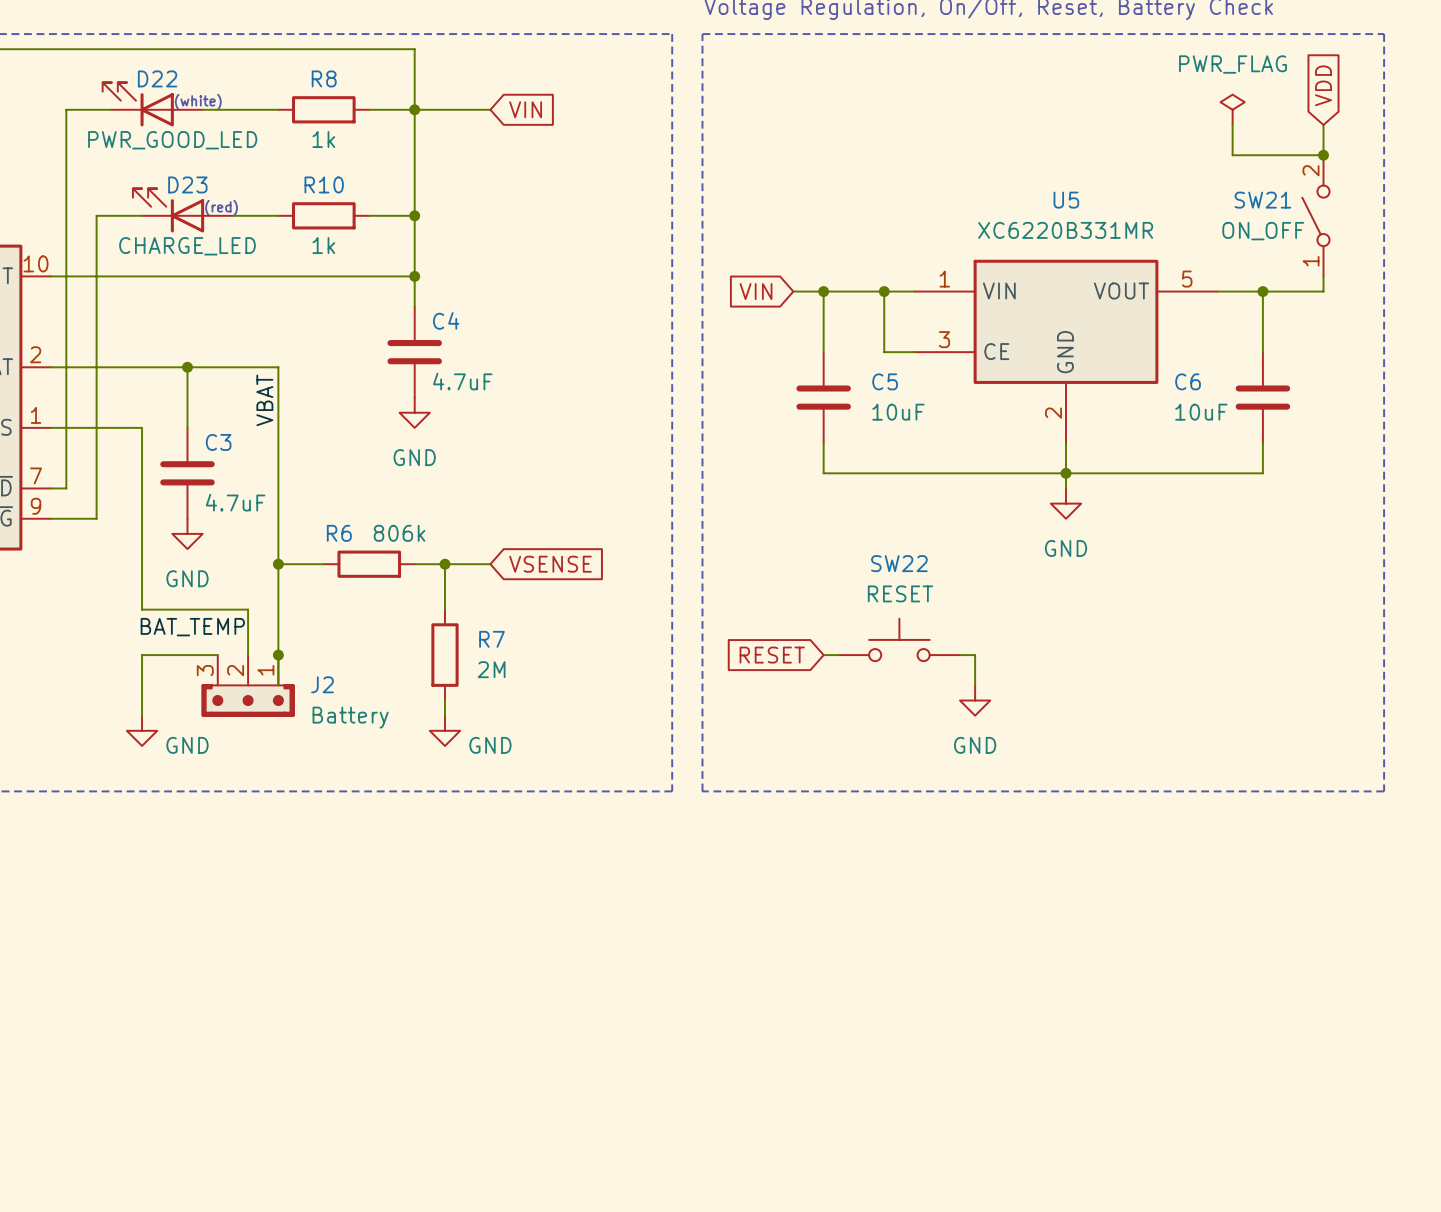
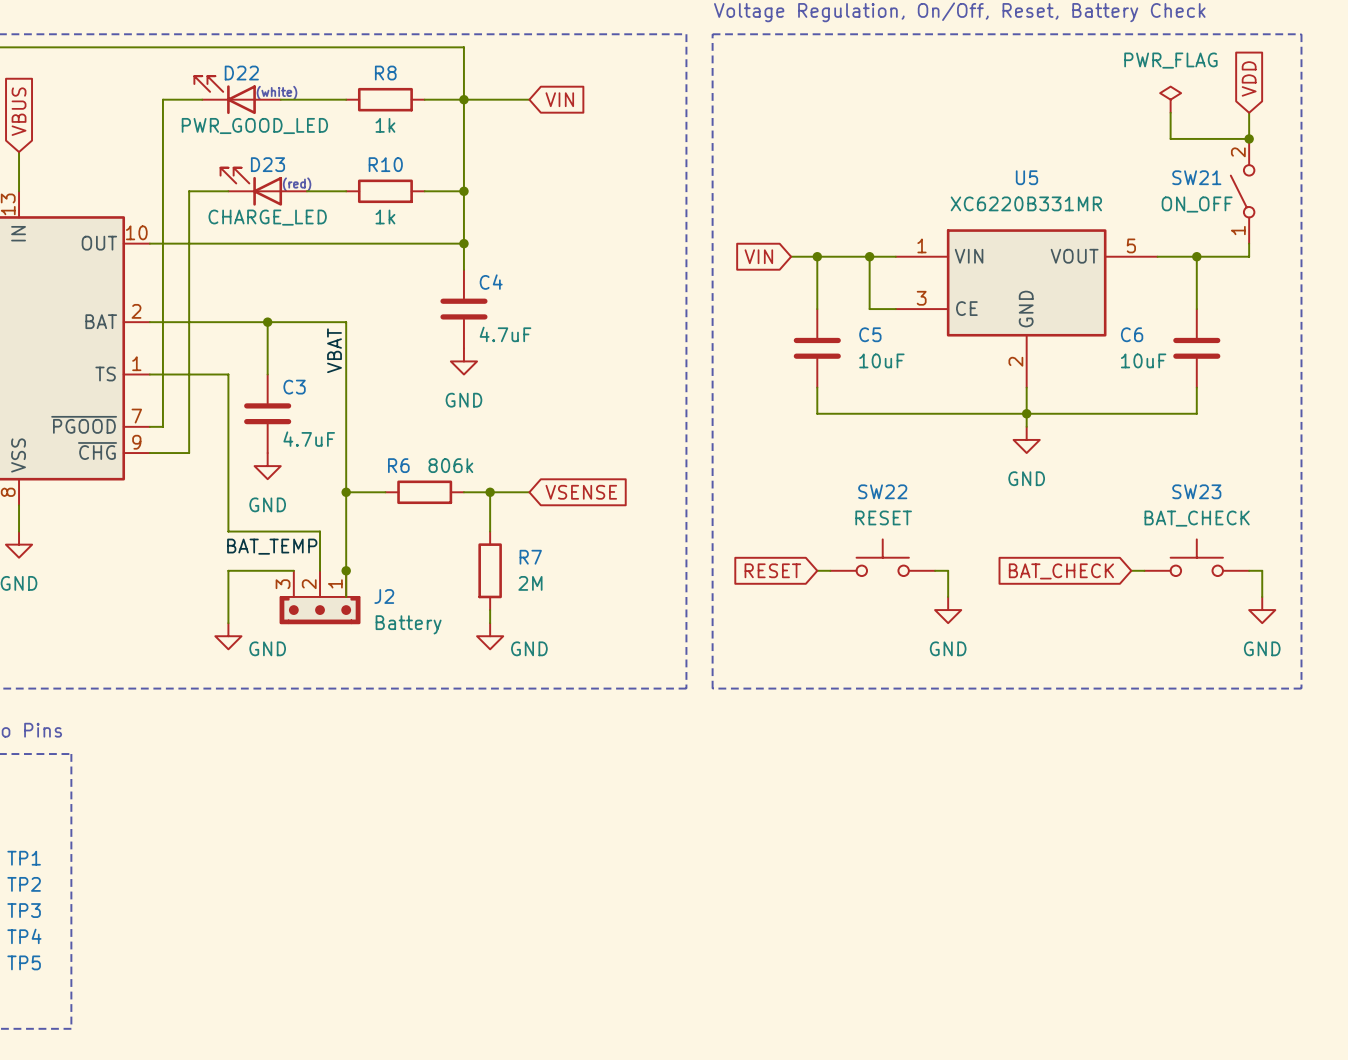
SW23: none -> BAT_CHECK (1196, 557)
global label: none -> BAT_CHECK (1061, 571)
wire: none -> (1131, 570) (1144, 570)
wire: none -> (1249, 570) (1262, 570) (1262, 596)
power symbol: none -> GND (1262, 610)

